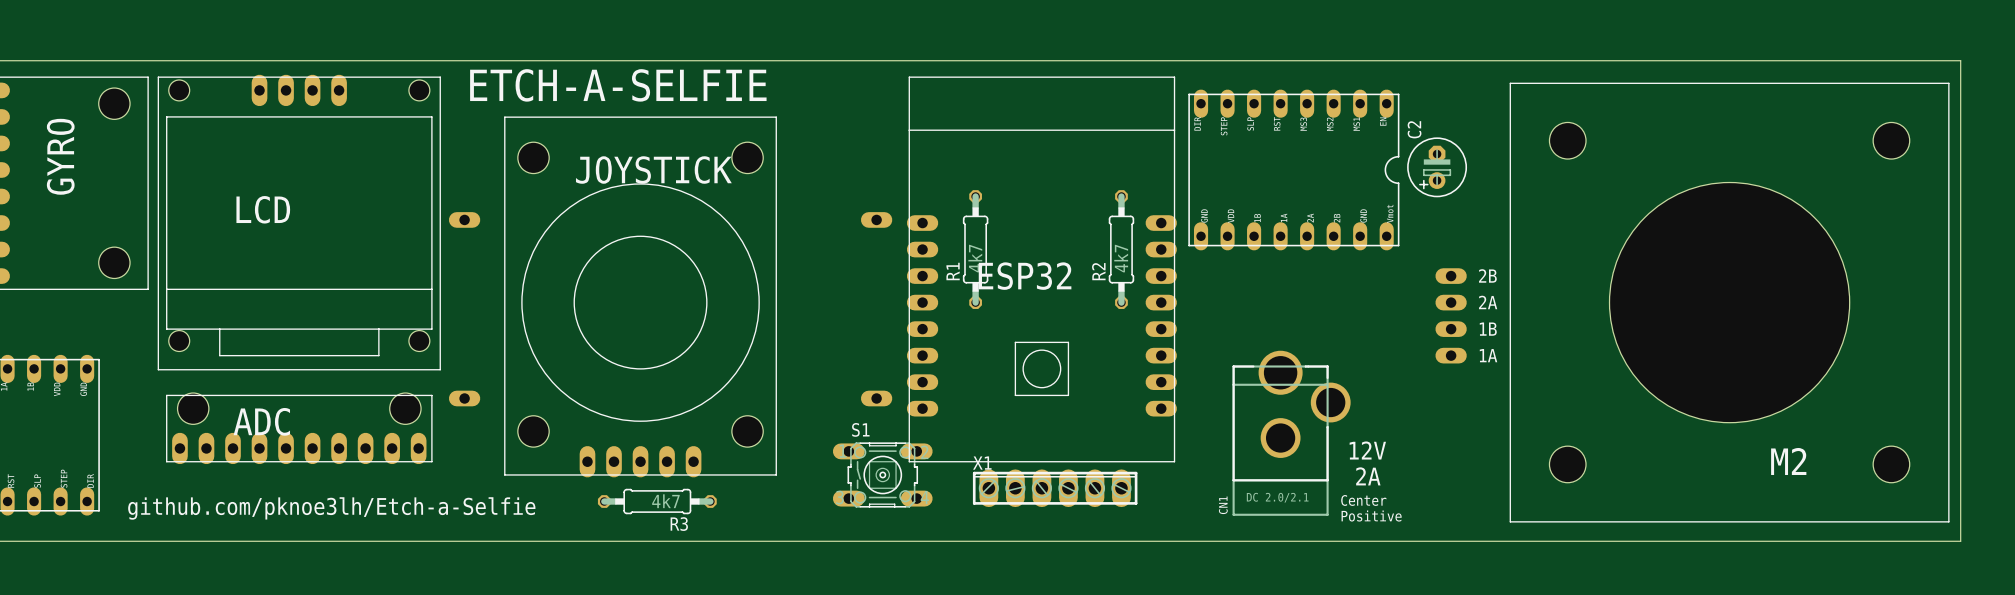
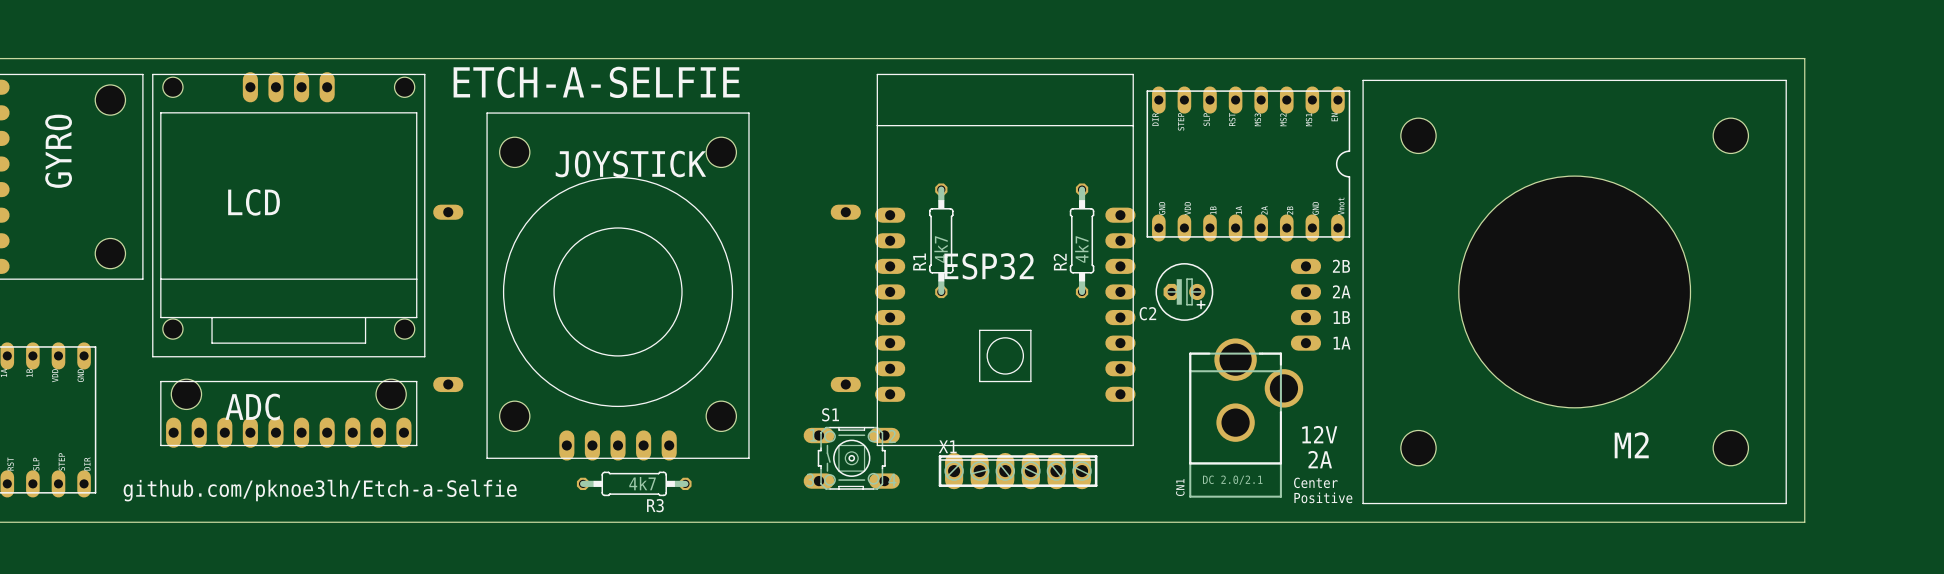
board edge: (1870, 60) (1960, 60) (1960, 541) (1870, 541) -> (1804, 58) (1804, 522)
C2 rotation: 0° (1437, 167) -> 90° counterclockwise (1184, 291)
C2 position: (1437, 167) -> (1184, 291)
M2 position: (1692, 302) -> (1538, 291)

